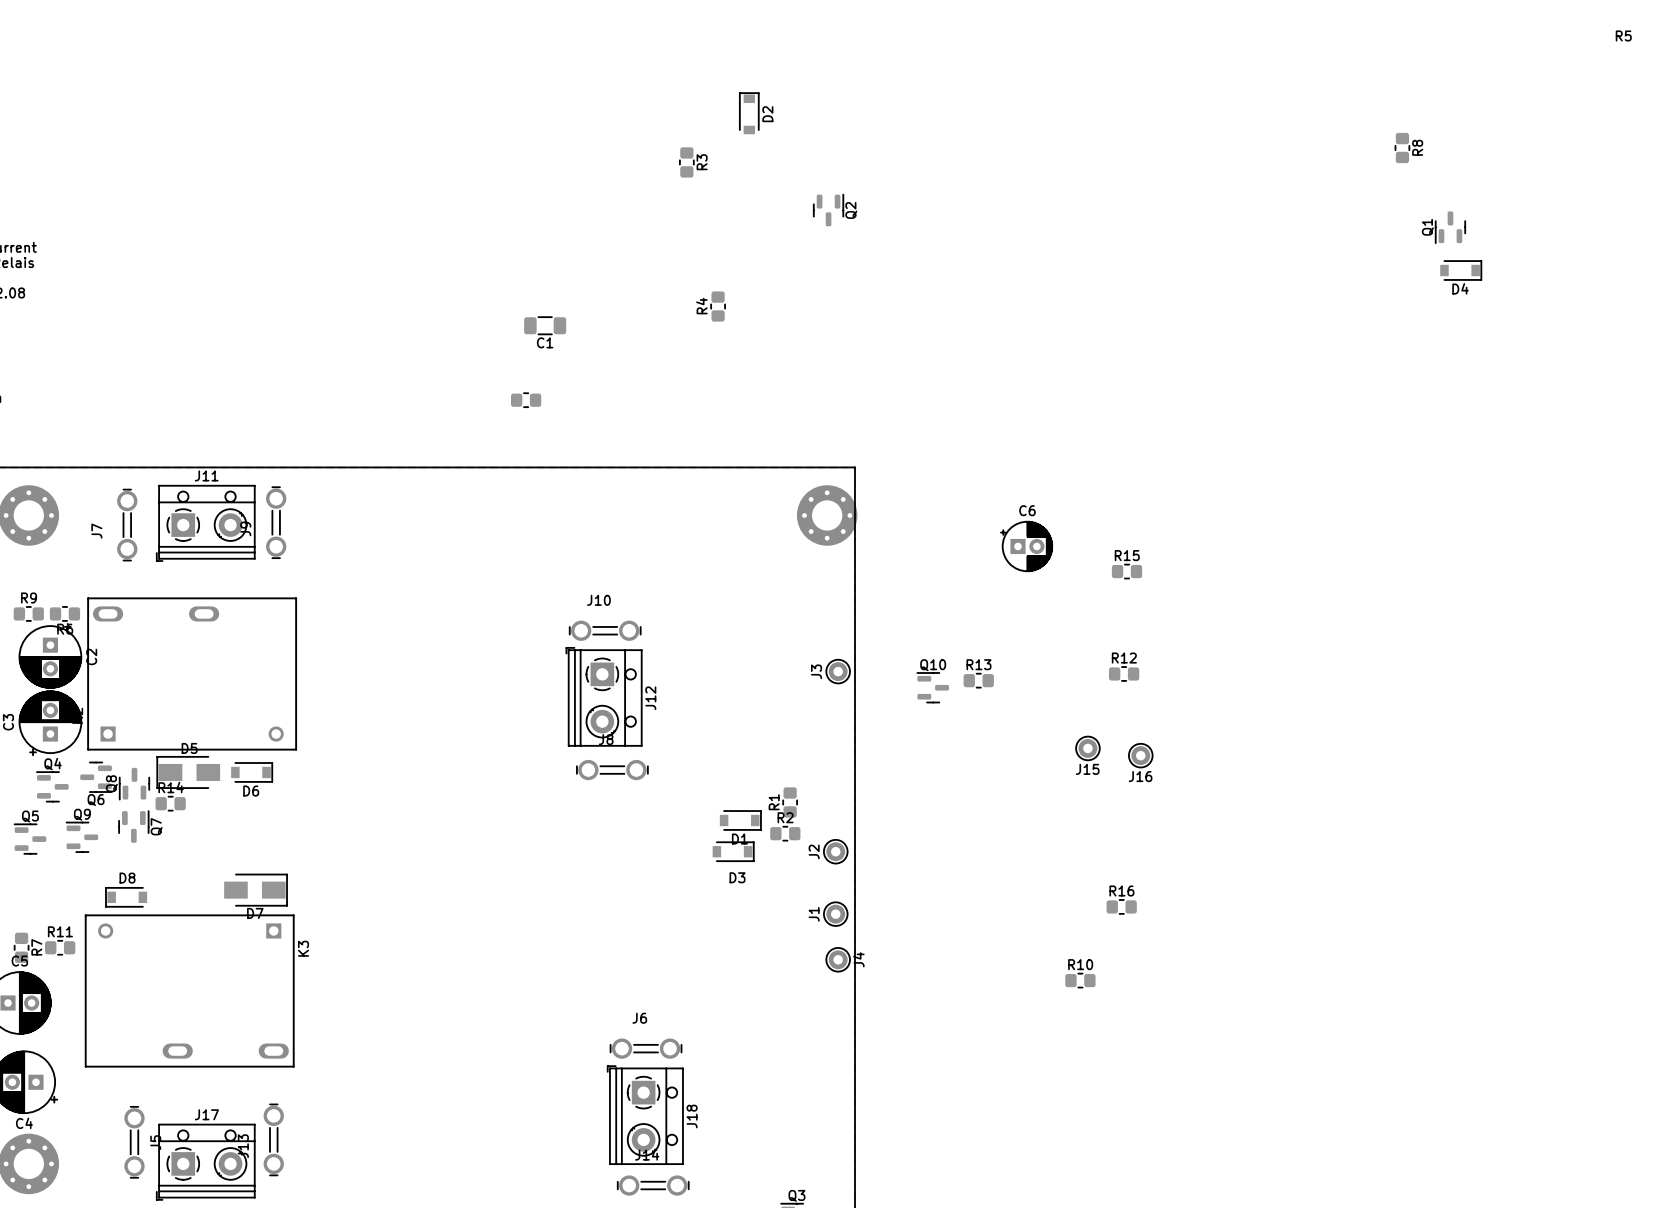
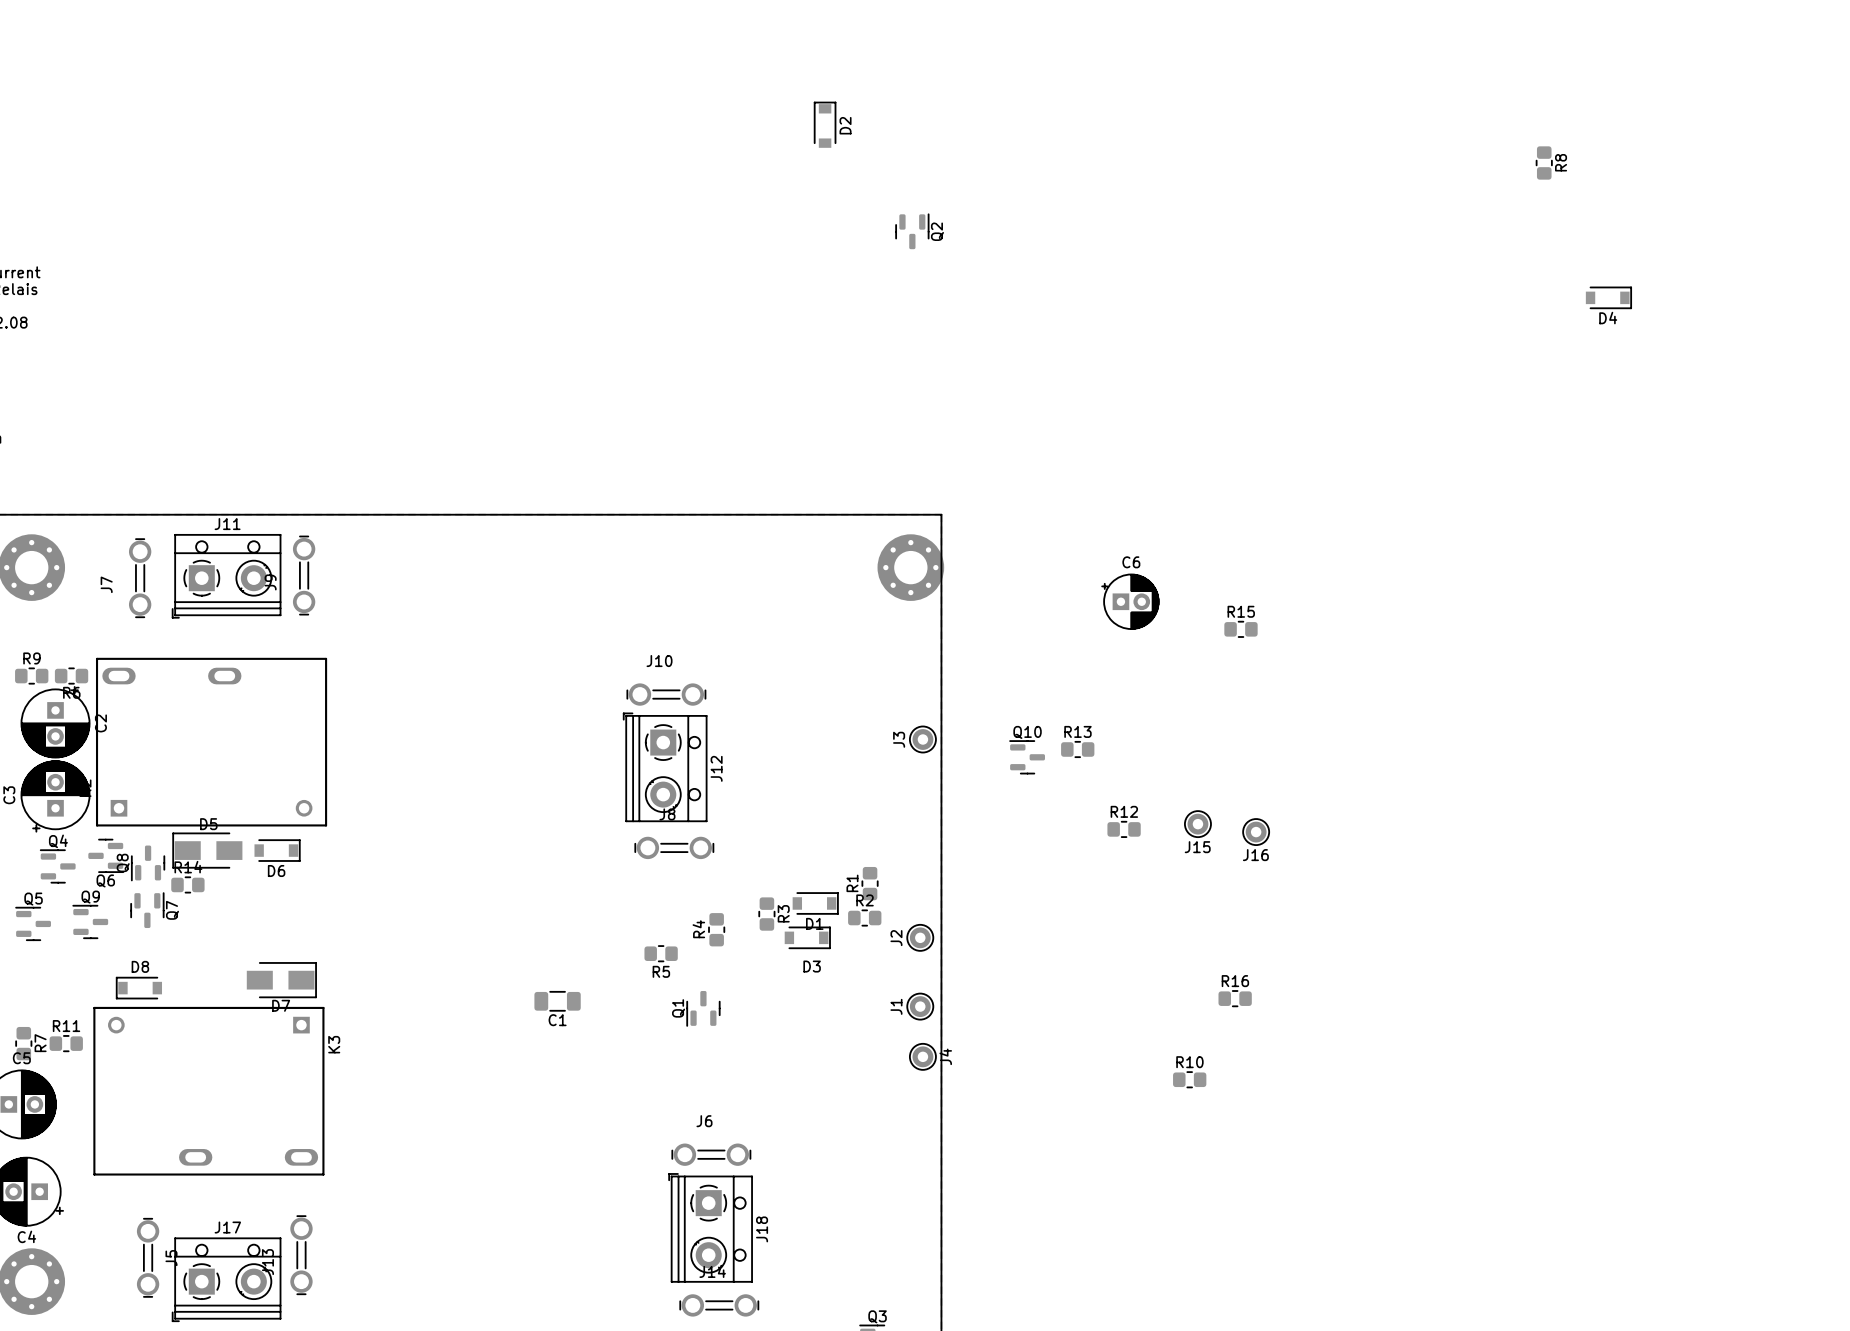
R5 name position: R5 (1623, 35) -> R5 (661, 971)
R3 position: (686, 162) -> (766, 914)
Q1 position: (1450, 227) -> (703, 1008)
R4 position: (718, 306) -> (716, 929)
C1 position: (545, 325) -> (557, 1001)
R5 position: (526, 400) -> (661, 953)
R12 position: (1124, 673) -> (1124, 829)

